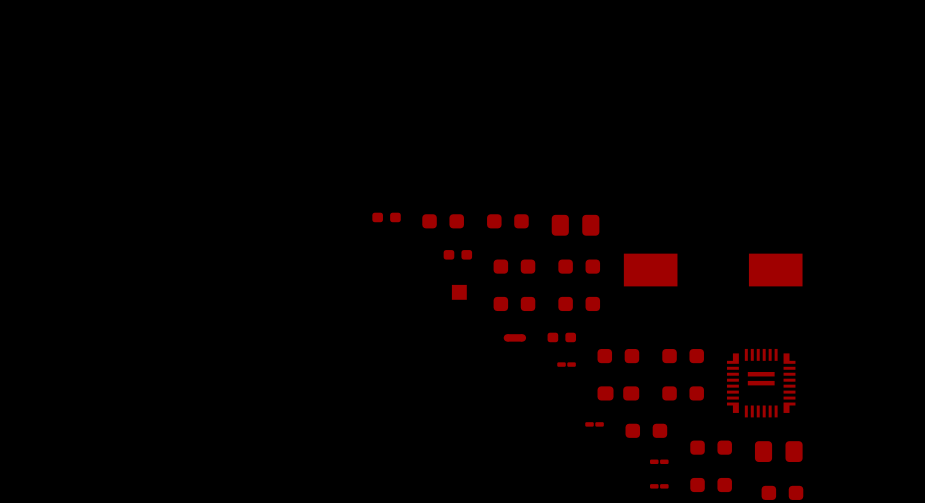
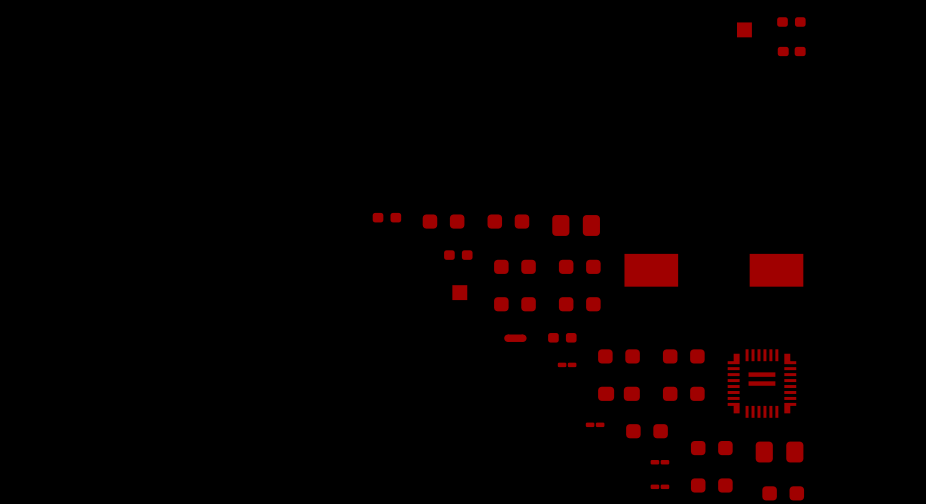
part: none -> (791, 21)
part: none -> (744, 29)
part: none -> (791, 51)

